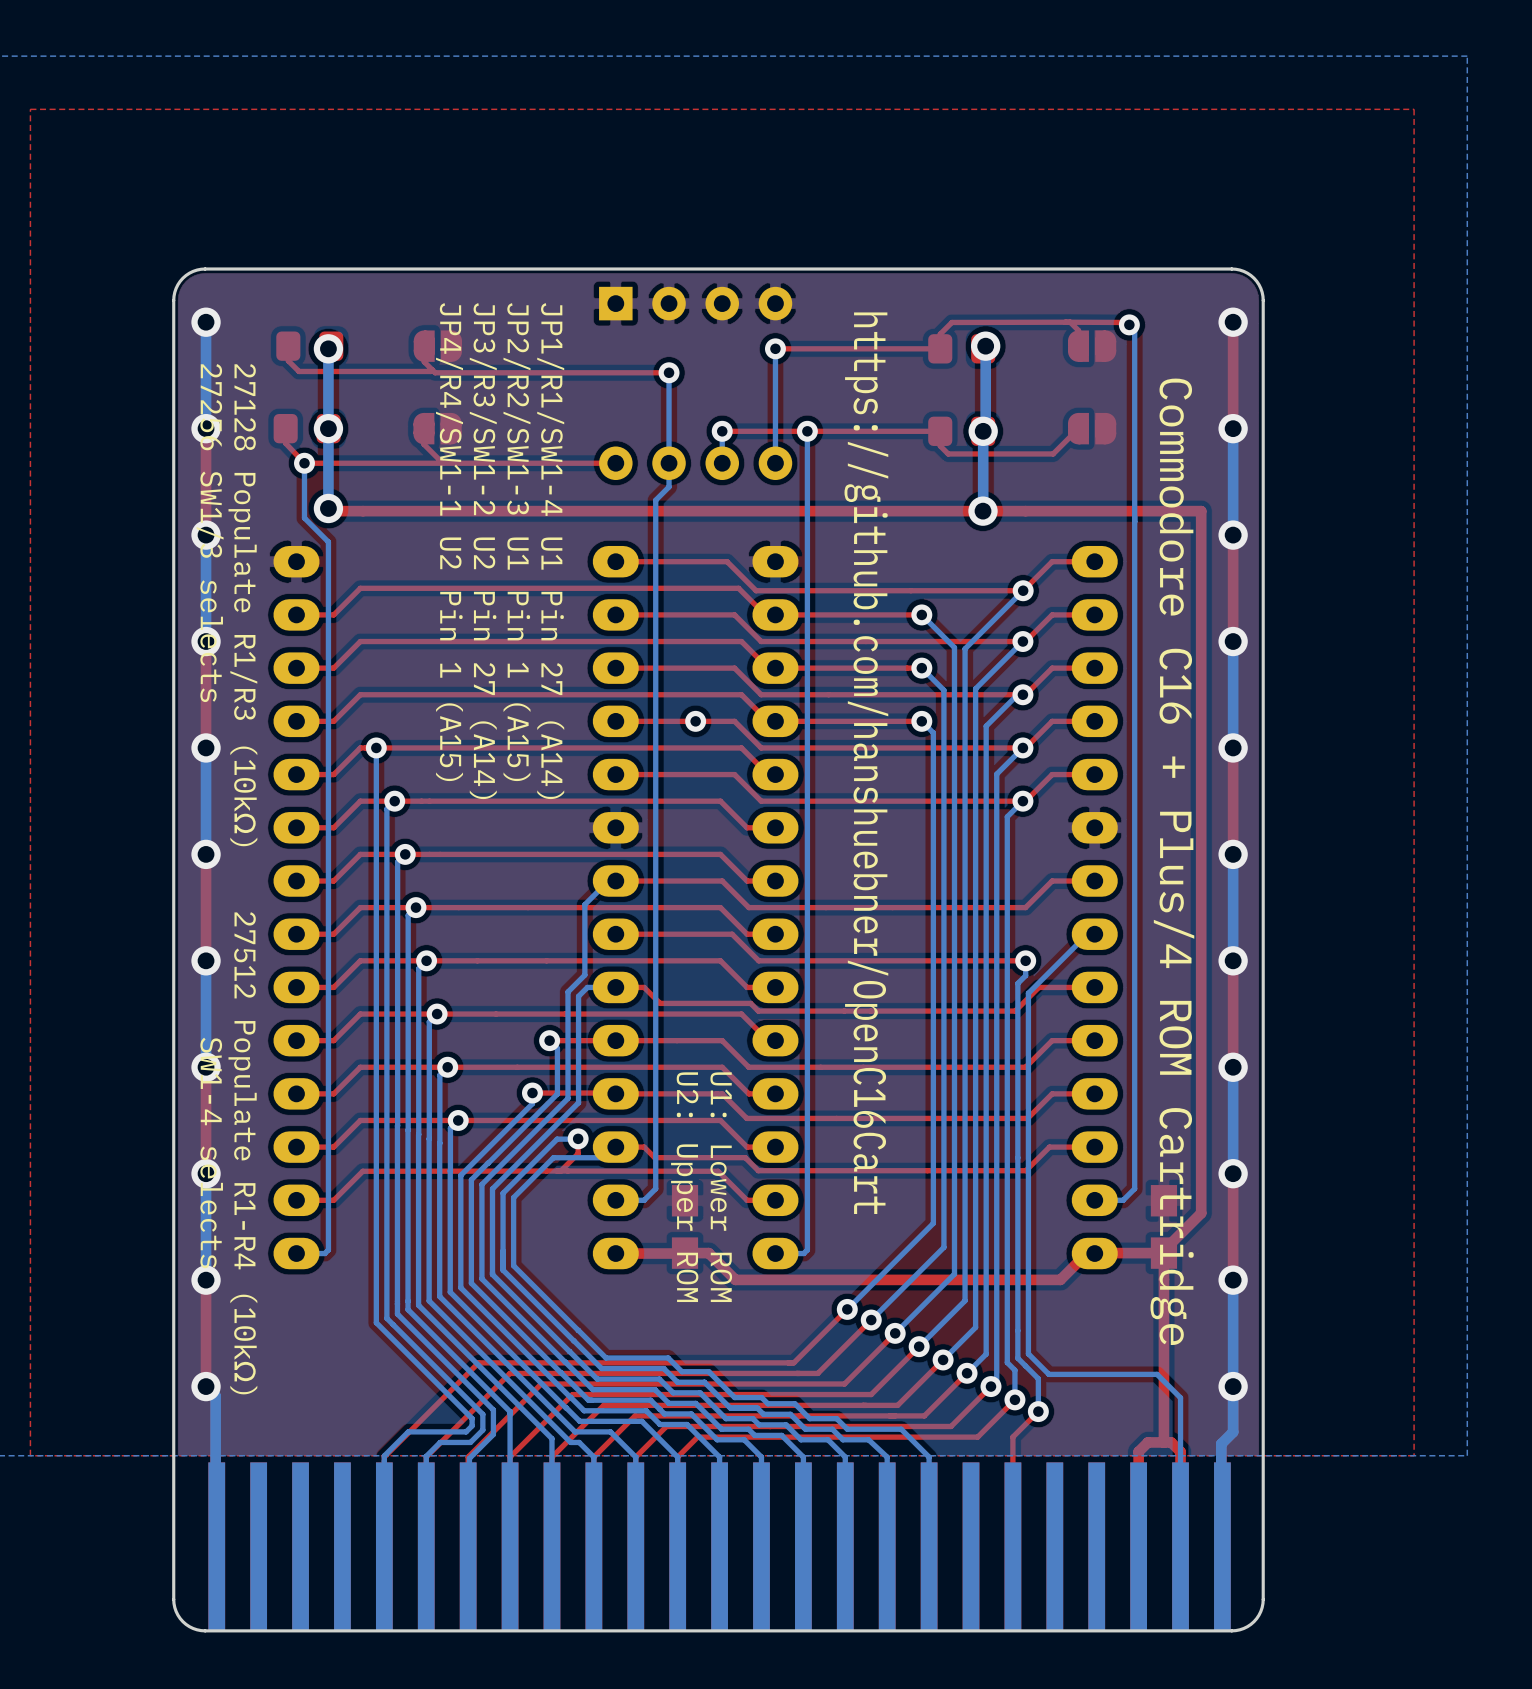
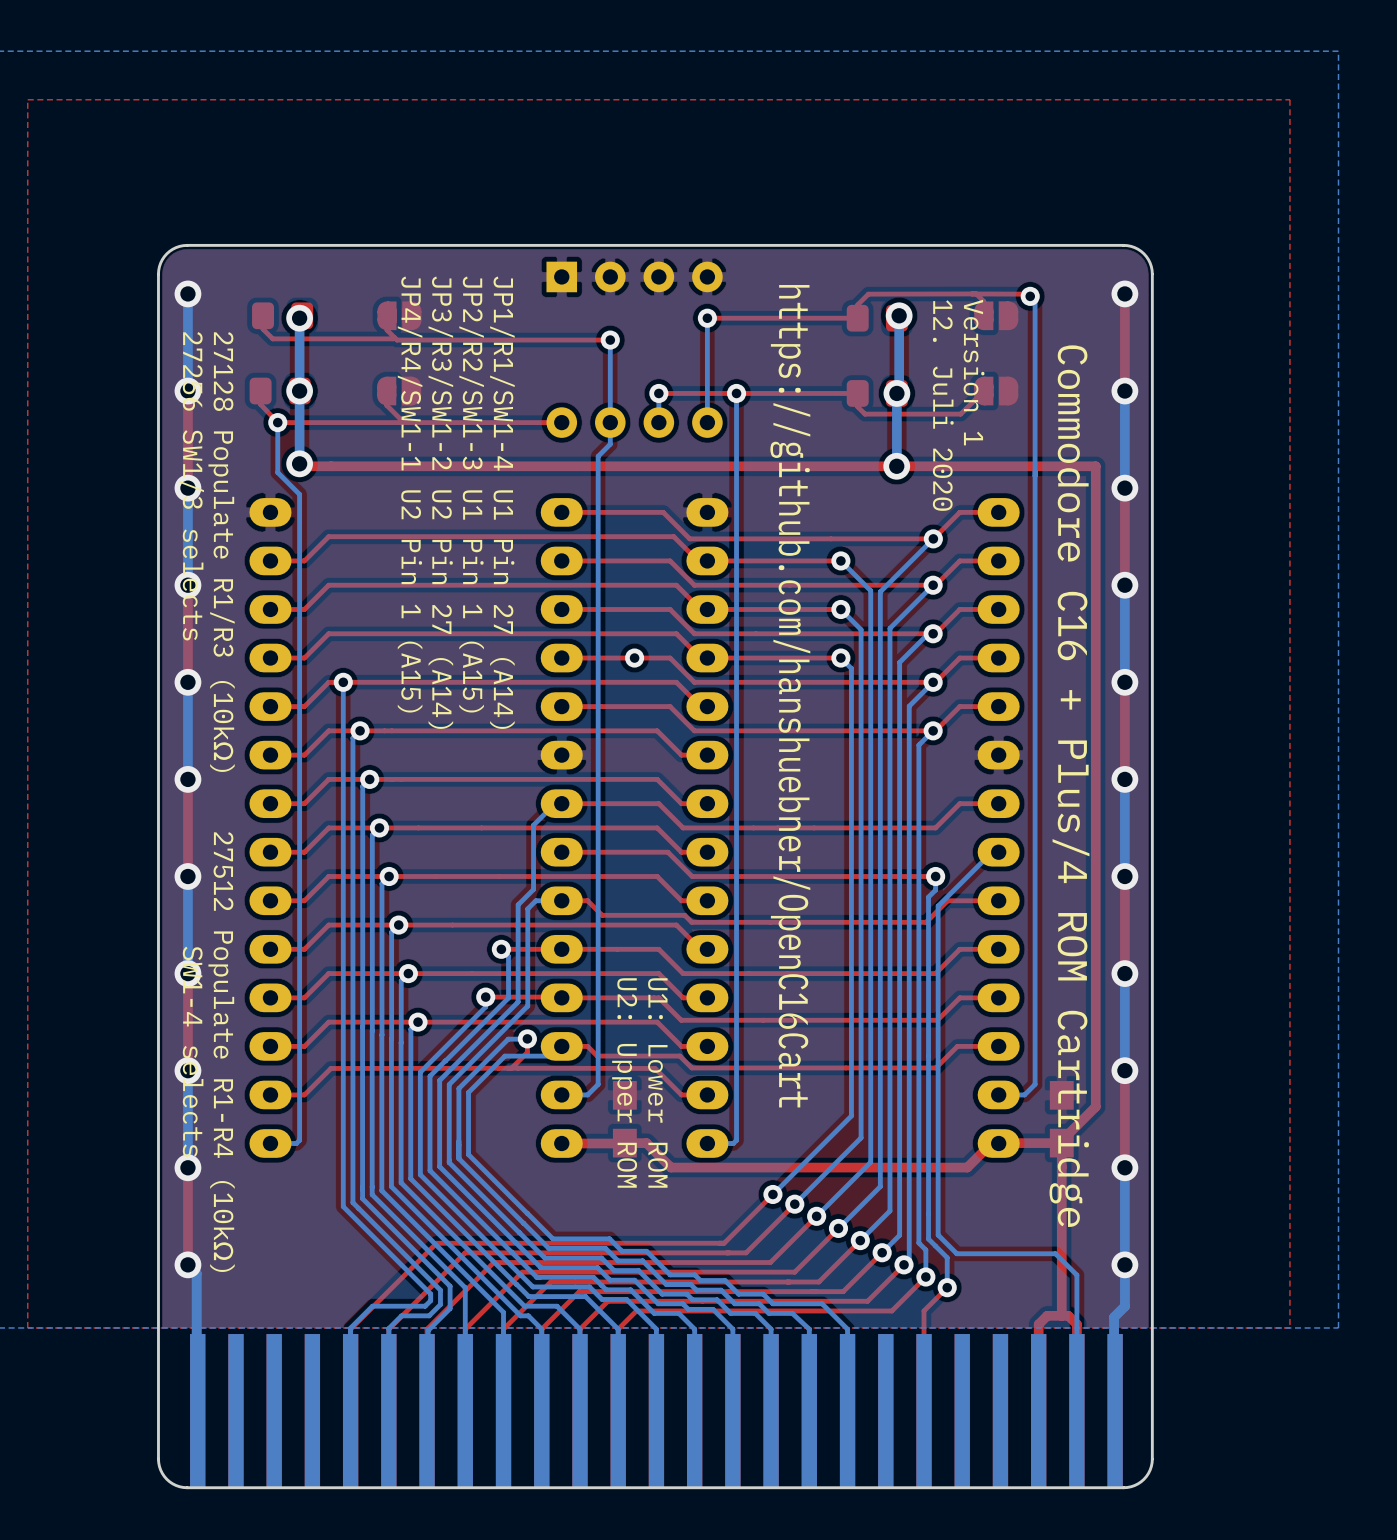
text: none -> Version 1 (974, 372)
text: none -> 12. Juli 2020 (943, 405)

